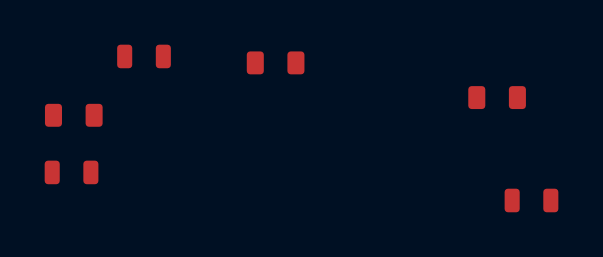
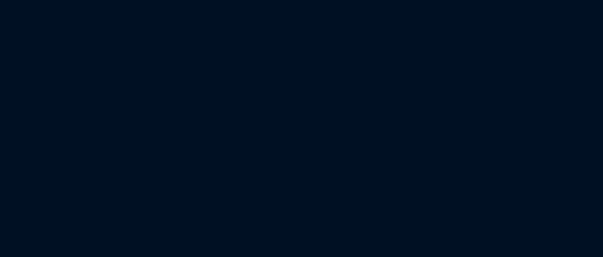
part: (144, 56) -> none
part: (275, 62) -> none
part: (497, 97) -> none
part: (73, 115) -> none
part: (71, 172) -> none
part: (531, 200) -> none

